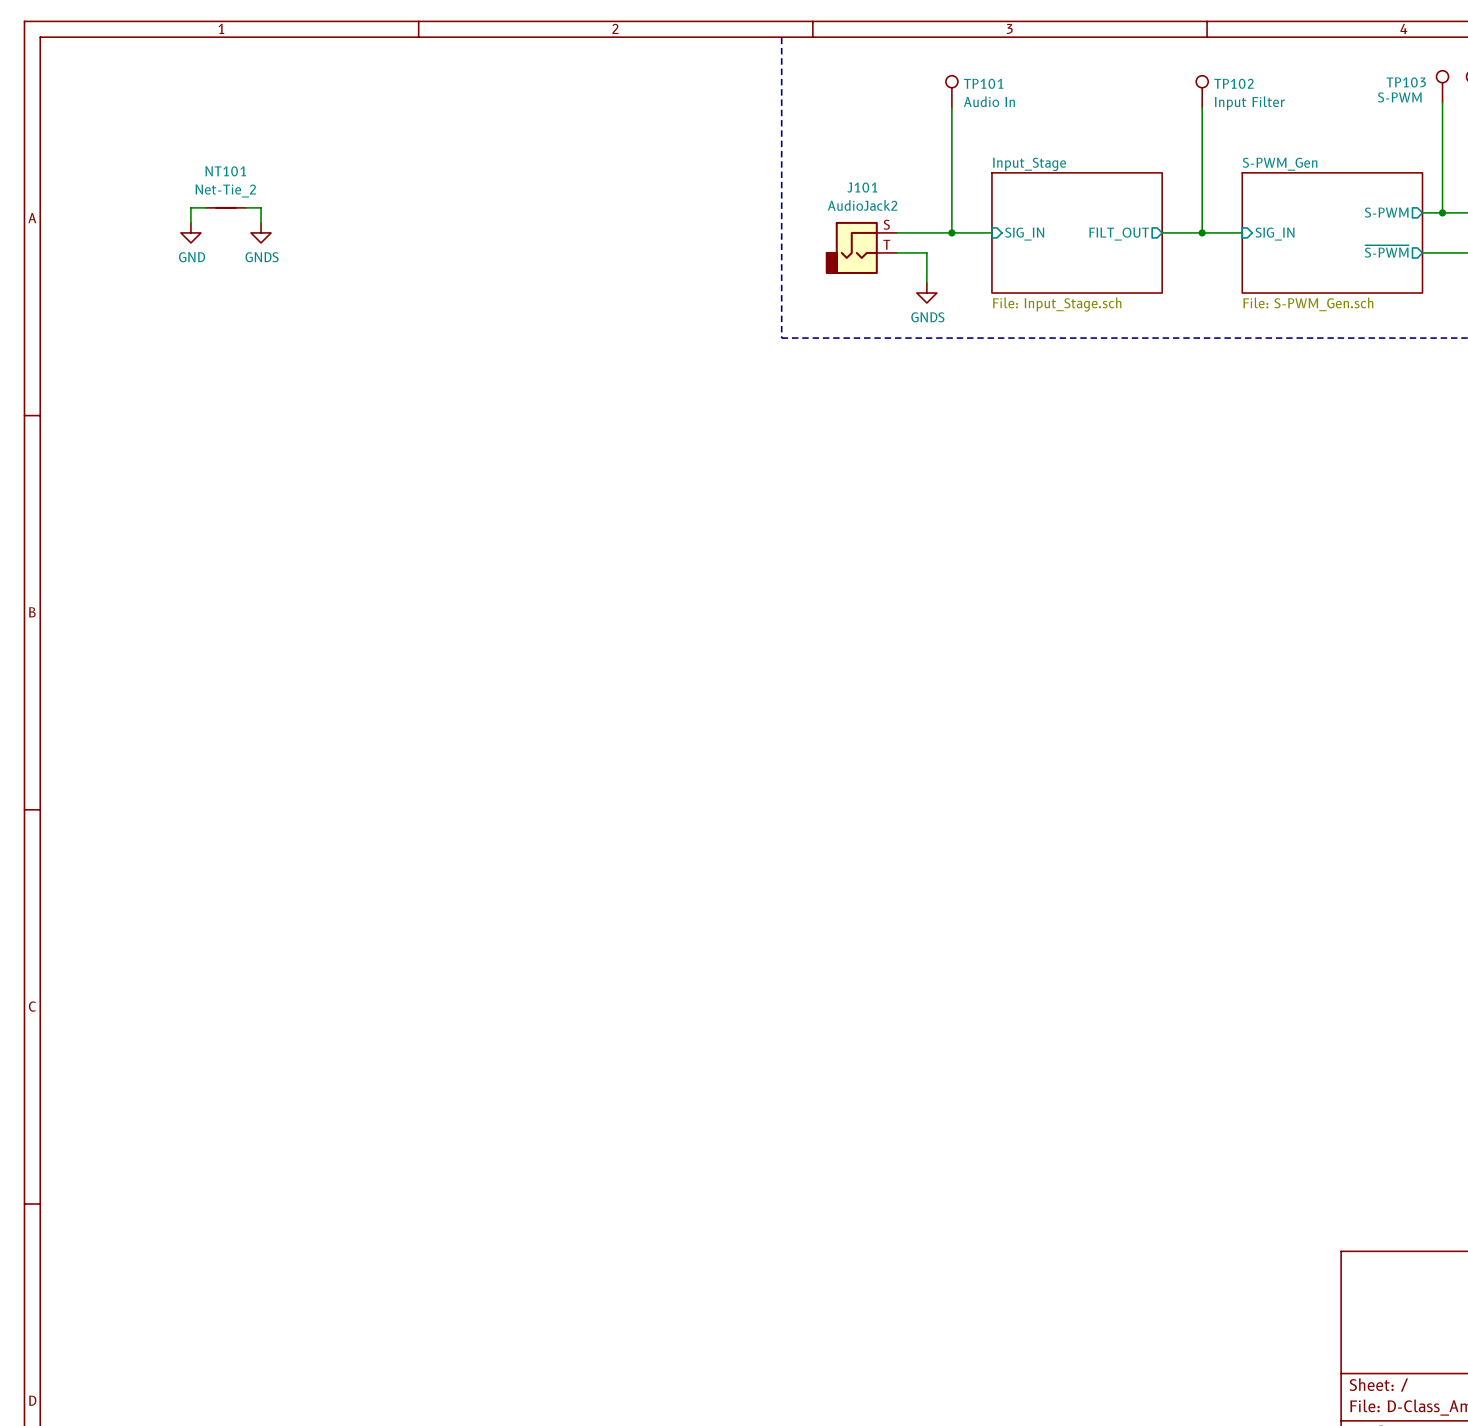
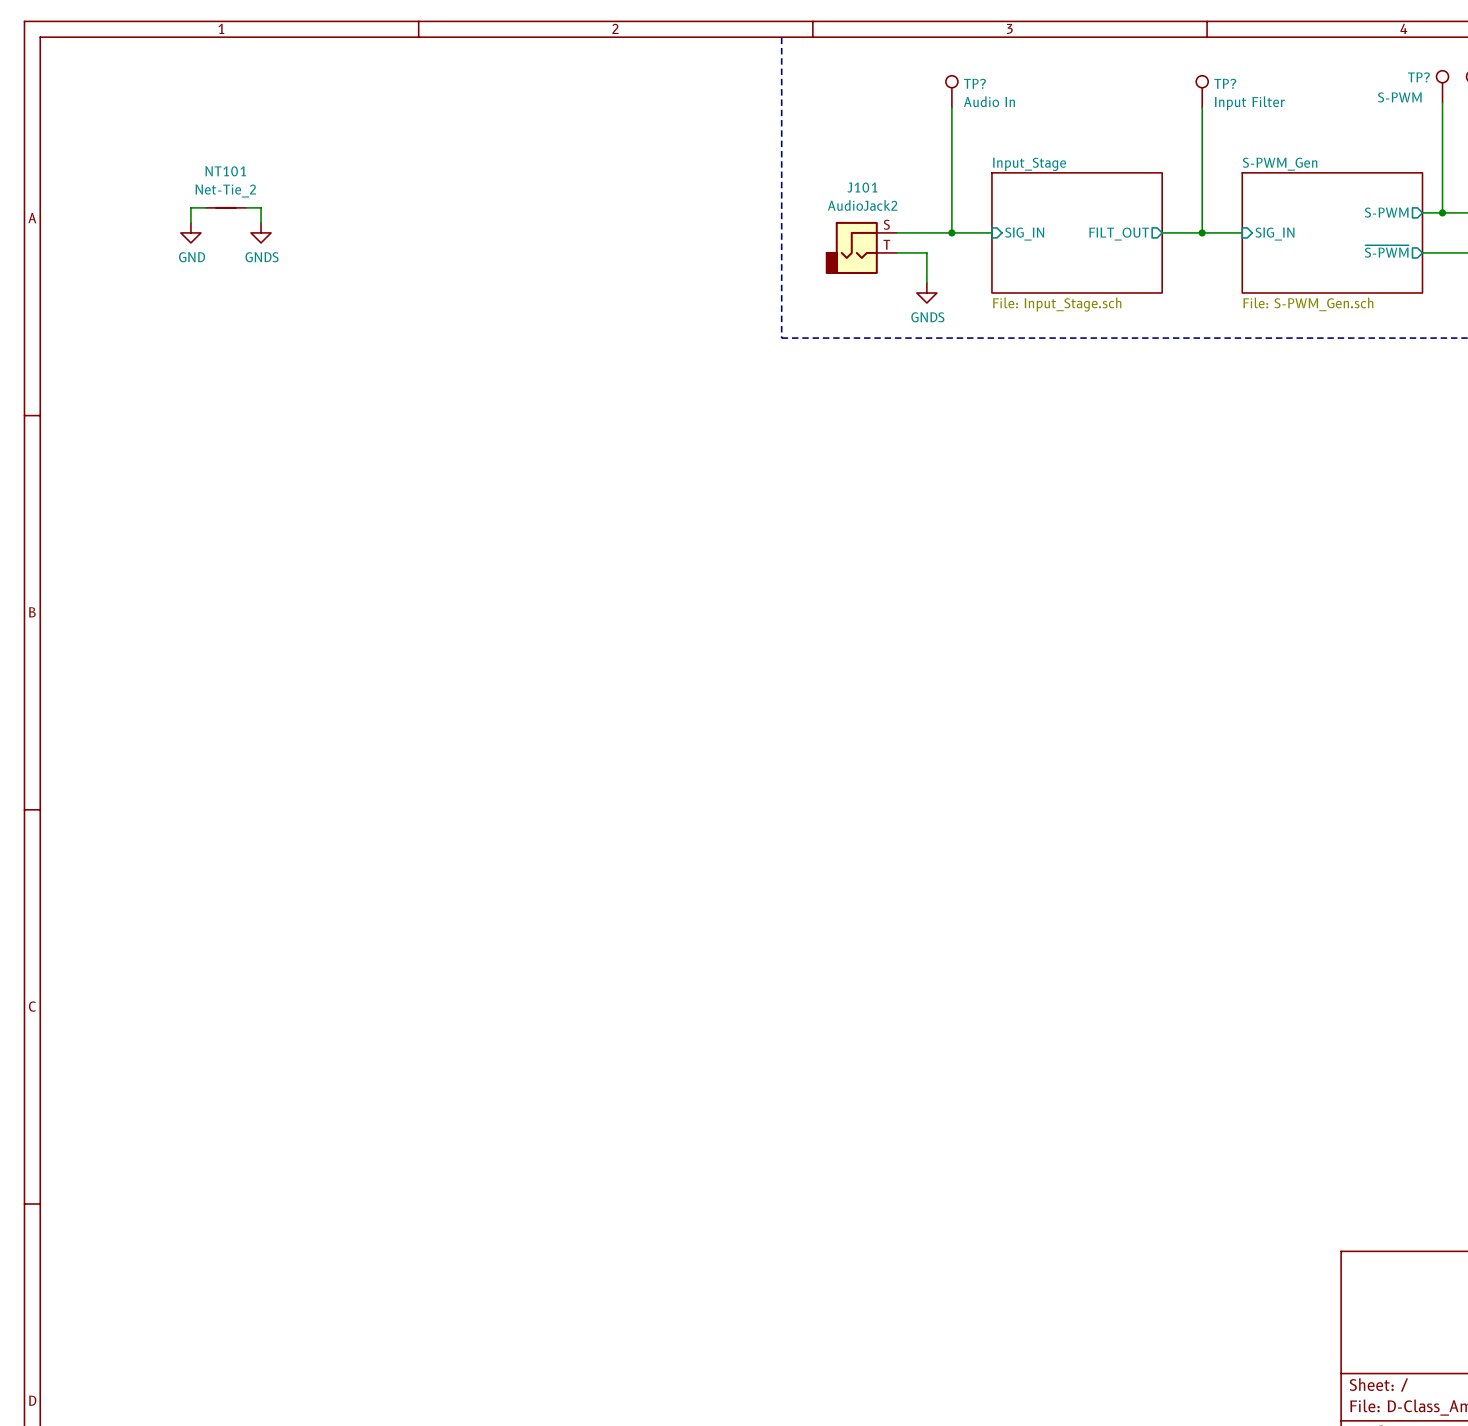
TP103 name: TP103 (1406, 82) -> TP? (1418, 77)
TP101 name: TP101 (983, 83) -> TP? (974, 83)
TP102 name: TP102 (1234, 83) -> TP? (1225, 83)

